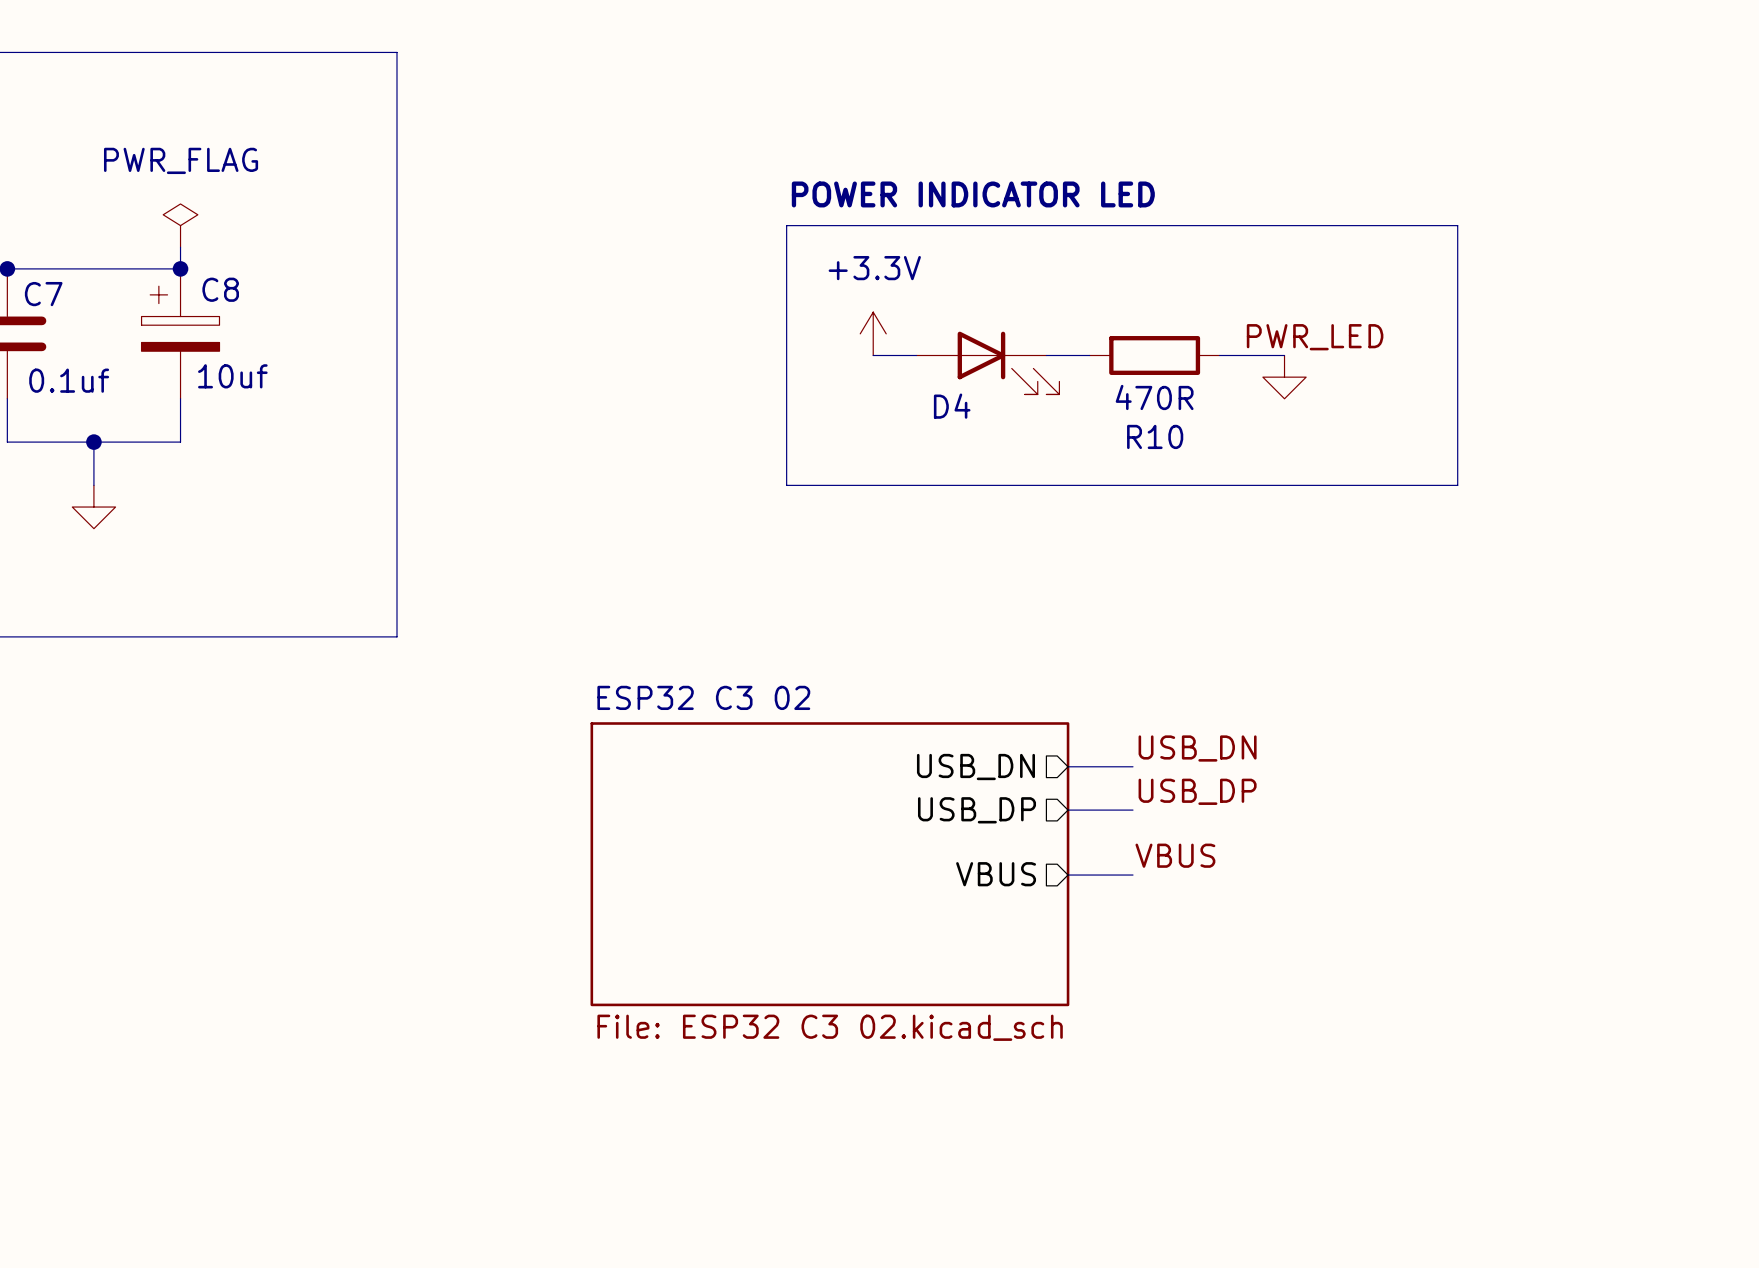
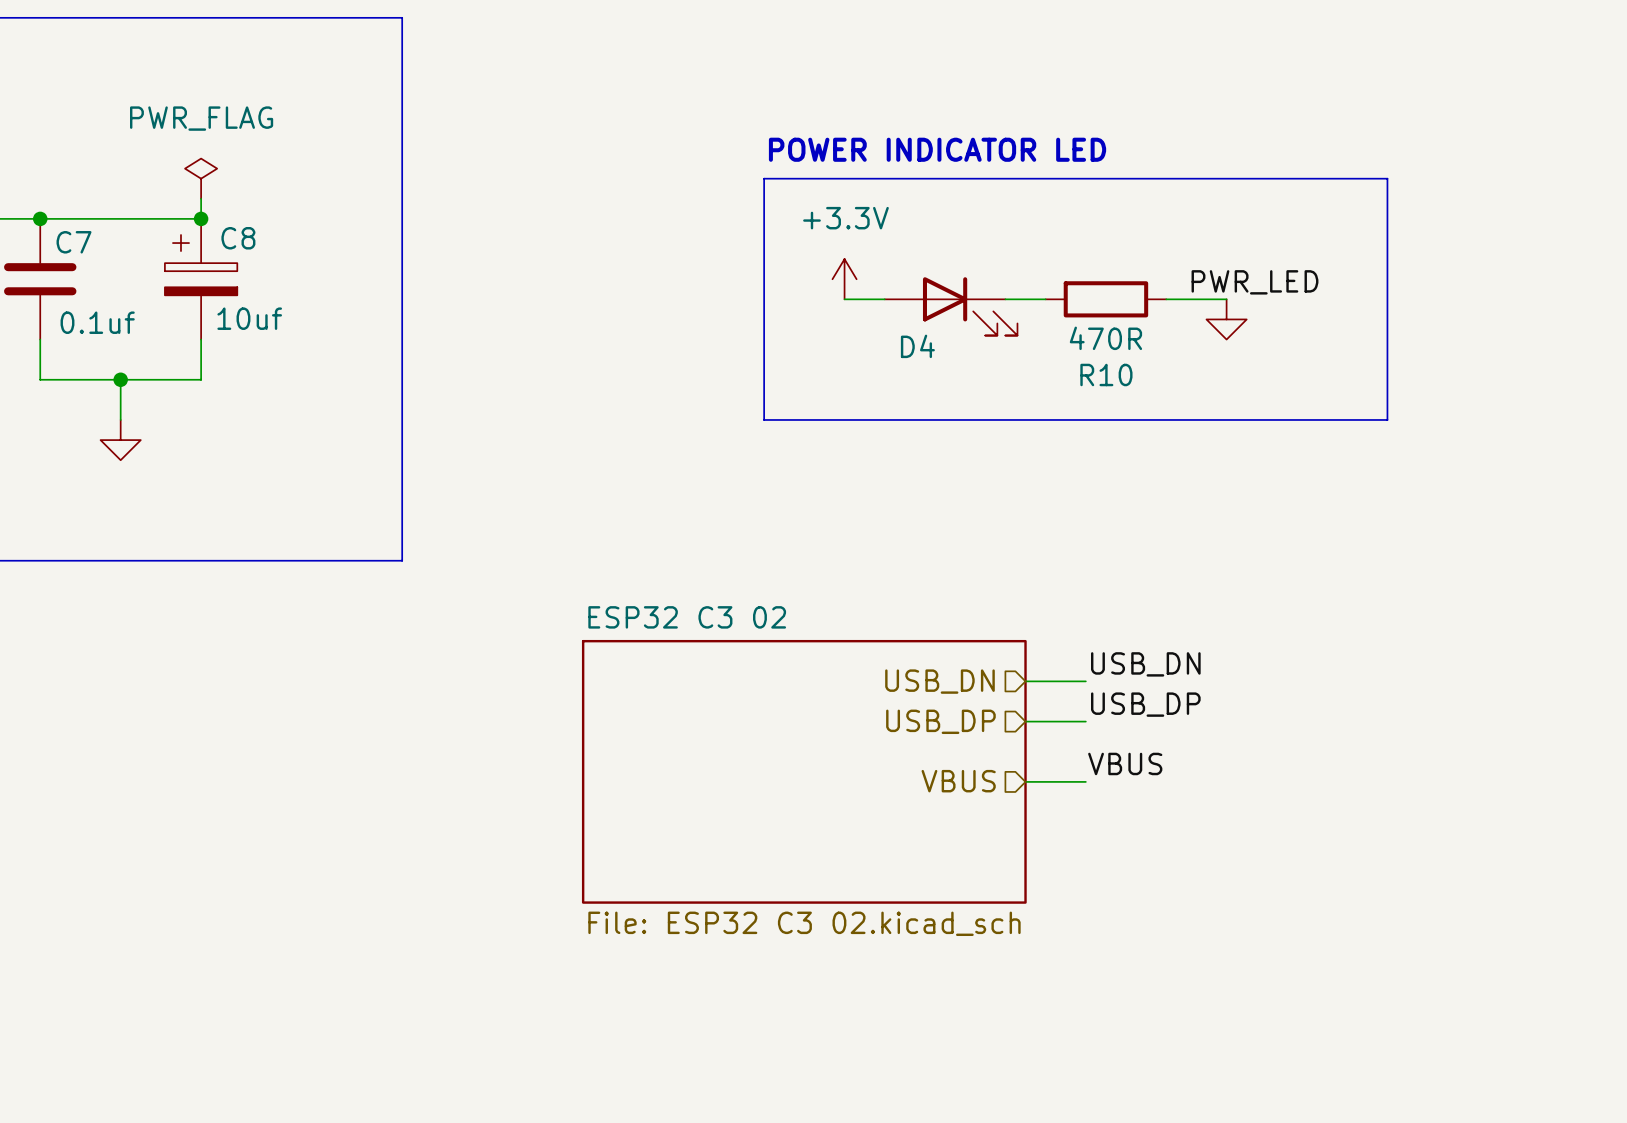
sheet pin: USB_DN (975, 767) -> none
hierarchical label: none -> USB_DN (939, 681)
sheet pin: USB_DP (977, 810) -> none
hierarchical label: none -> USB_DP (940, 721)
sheet pin: VBUS (996, 874) -> none
hierarchical label: none -> VBUS (958, 781)

